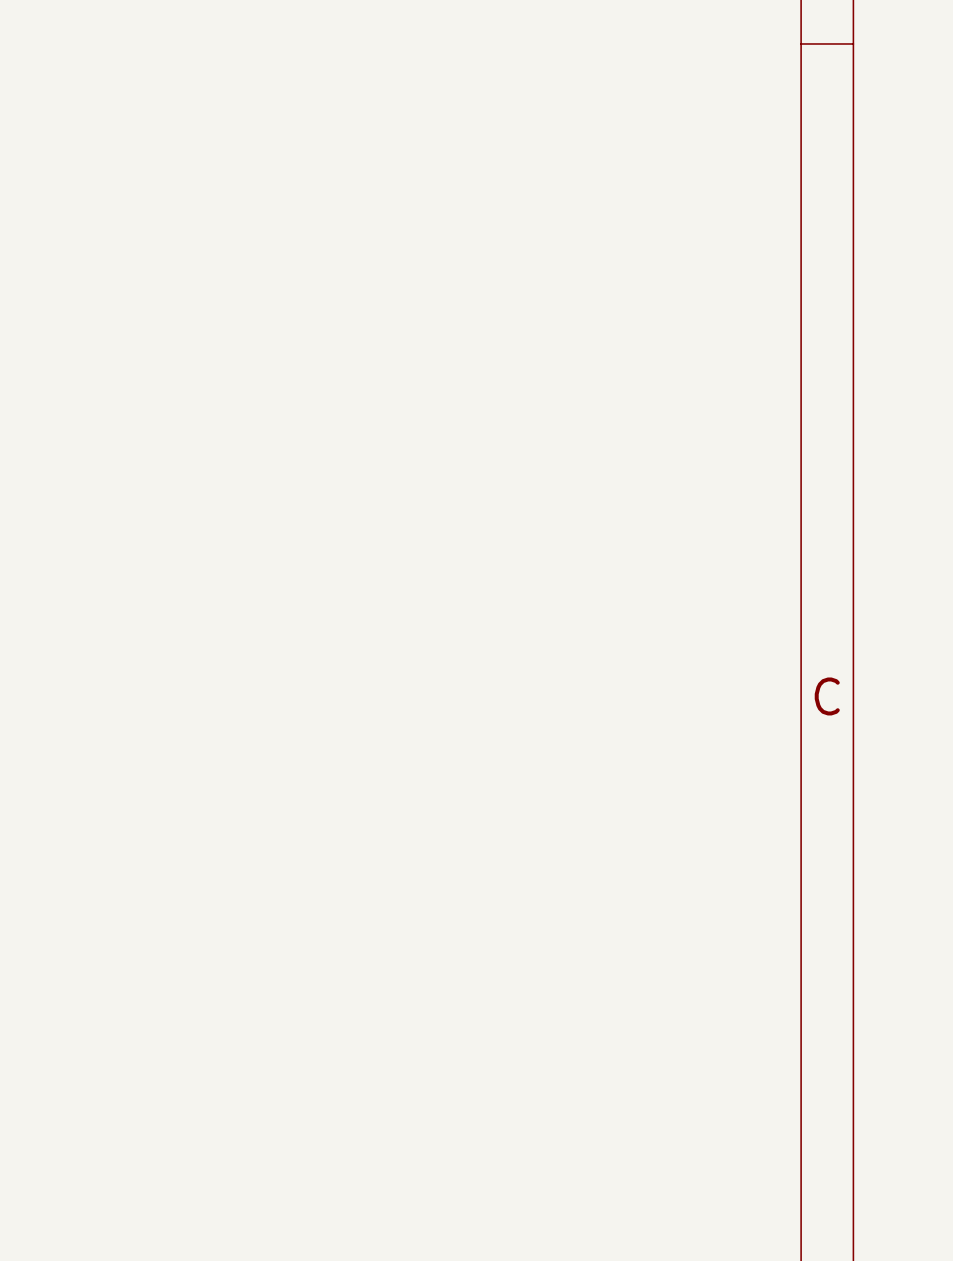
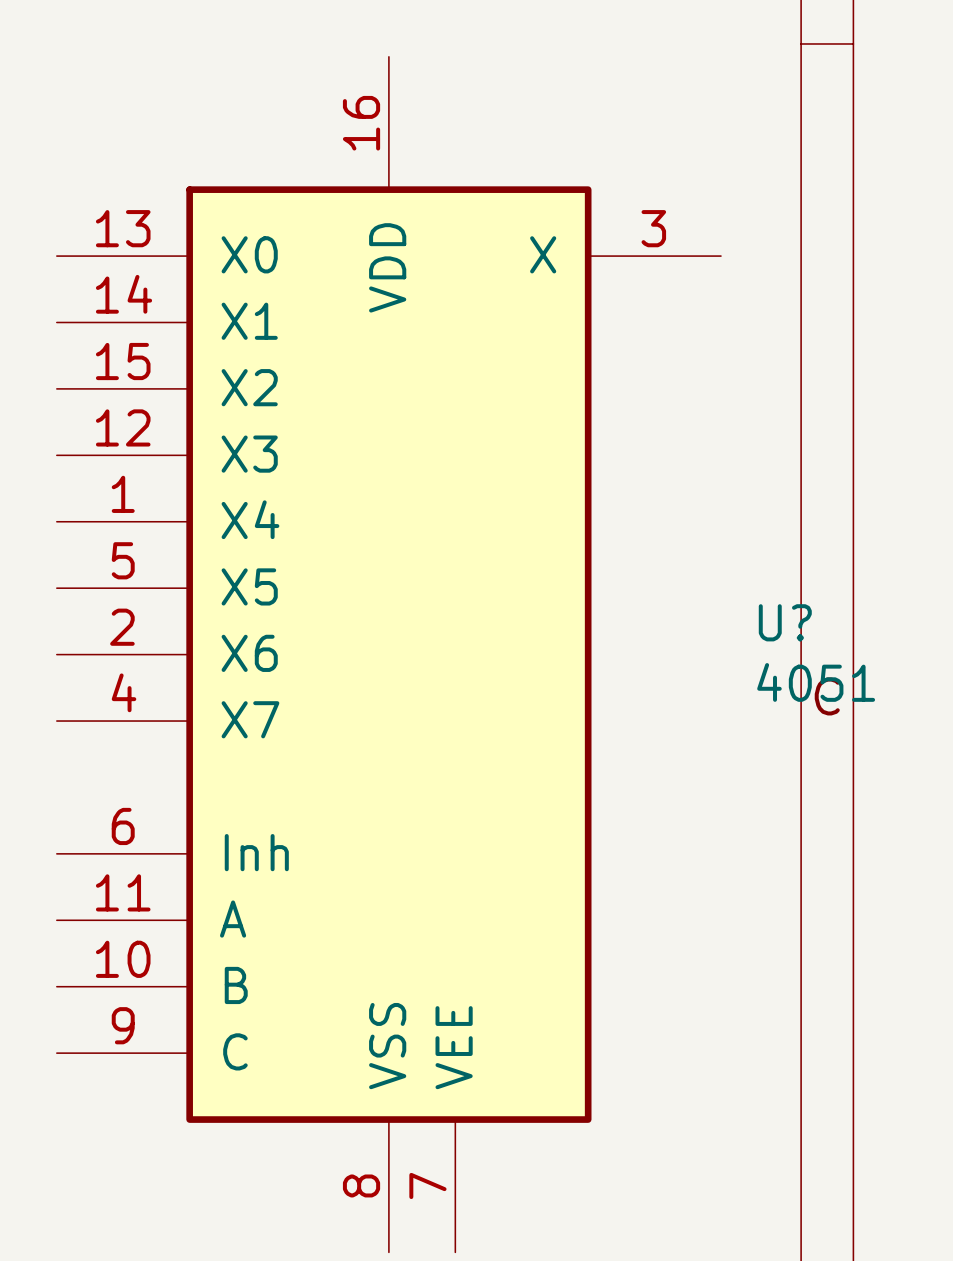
U?: none -> 4051 (388, 654)

